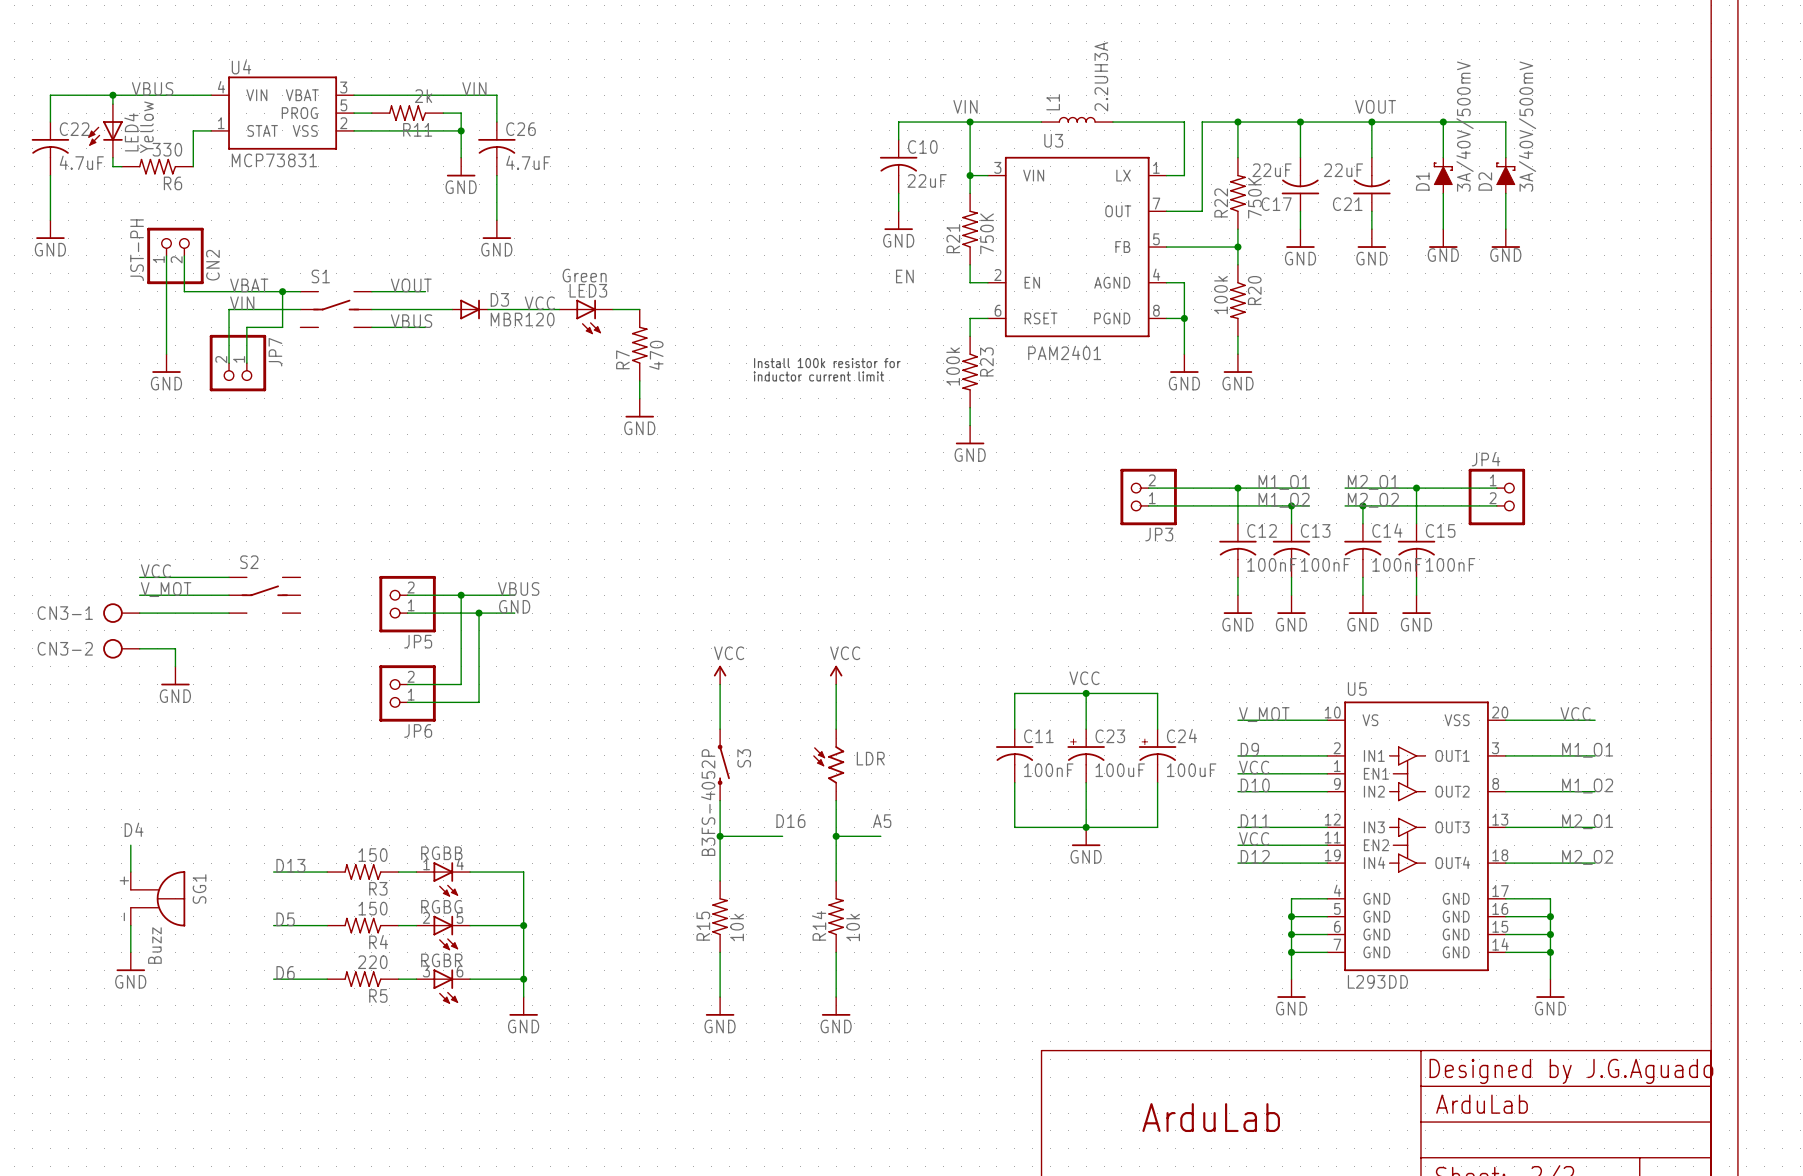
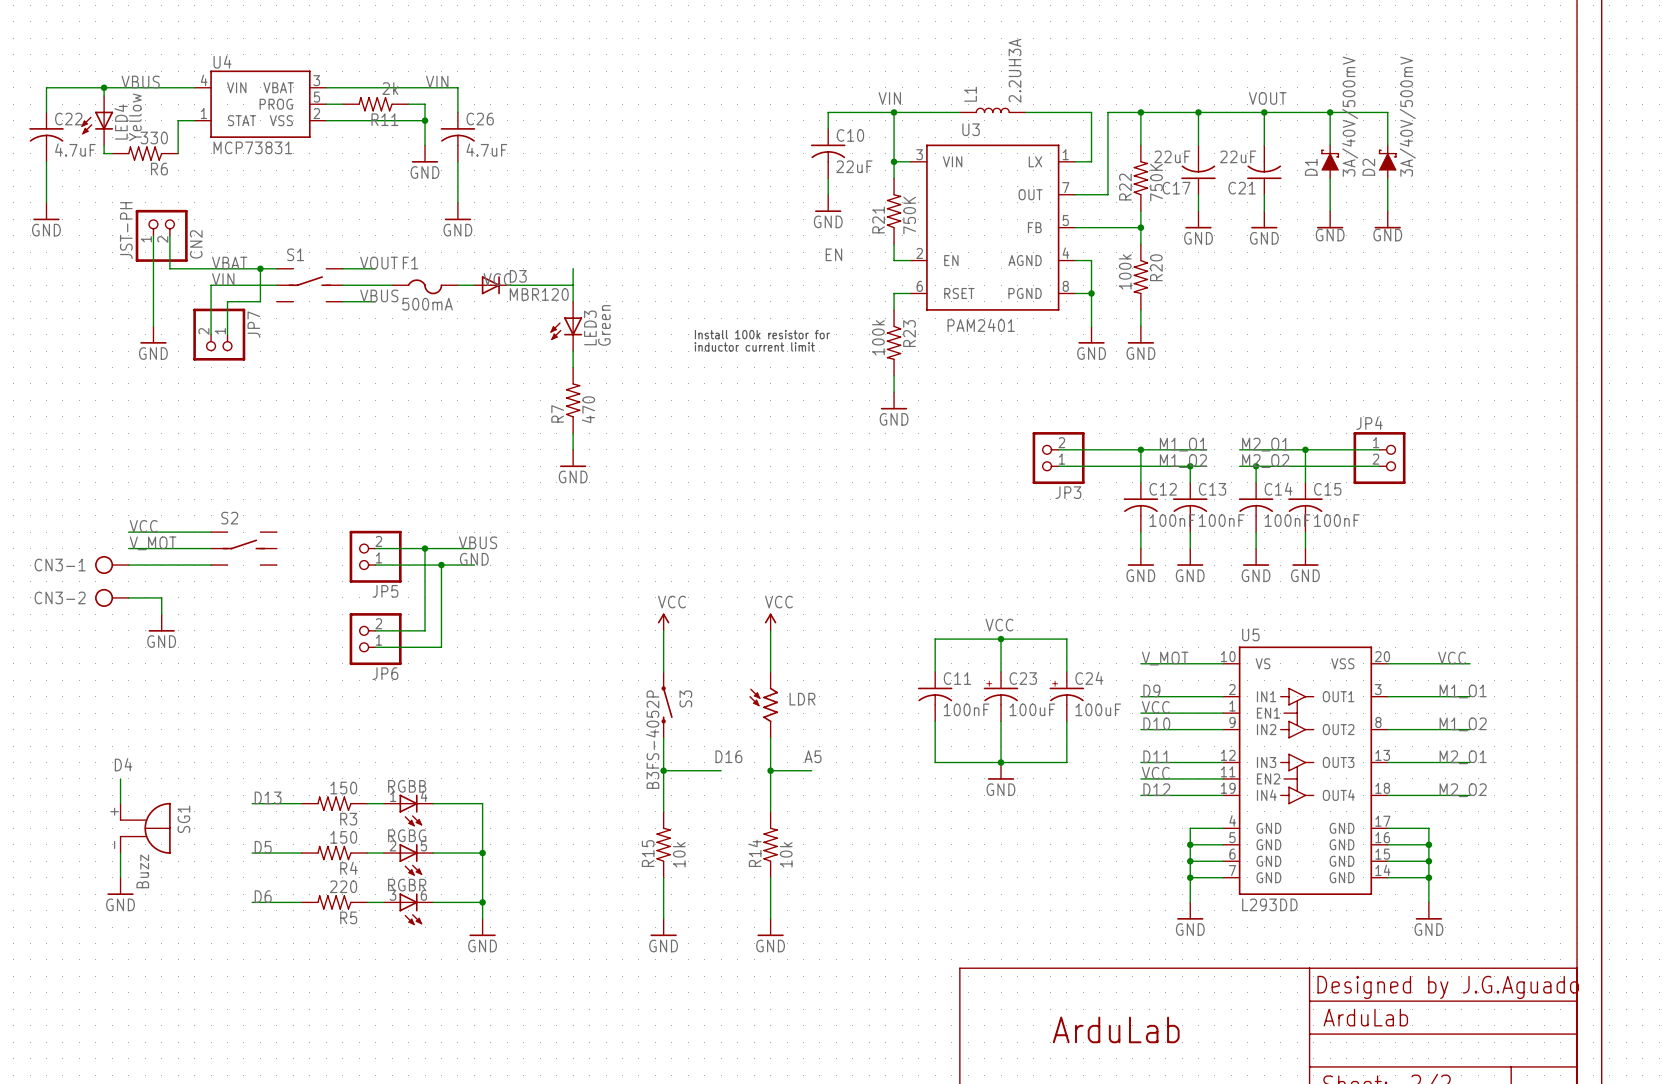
wire: (407, 291) (425, 291) -> none
wire: none -> (573, 268) (573, 301)
D3 position: (470, 309) -> (490, 285)
wire: (621, 309) (639, 309) -> none
F1: none -> 500mA (425, 286)
LED3 position: (586, 316) -> (566, 326)
LED3 rotation: 0° (588, 316) -> 90° clockwise (566, 328)
wire: (407, 327) (425, 327) -> none
R7 position: (639, 345) -> (573, 400)
wire: (639, 380) (639, 398) -> (573, 351) (573, 367)
power symbol position: GND (639, 408) -> GND (573, 458)
wire: none -> (573, 433) (573, 449)

